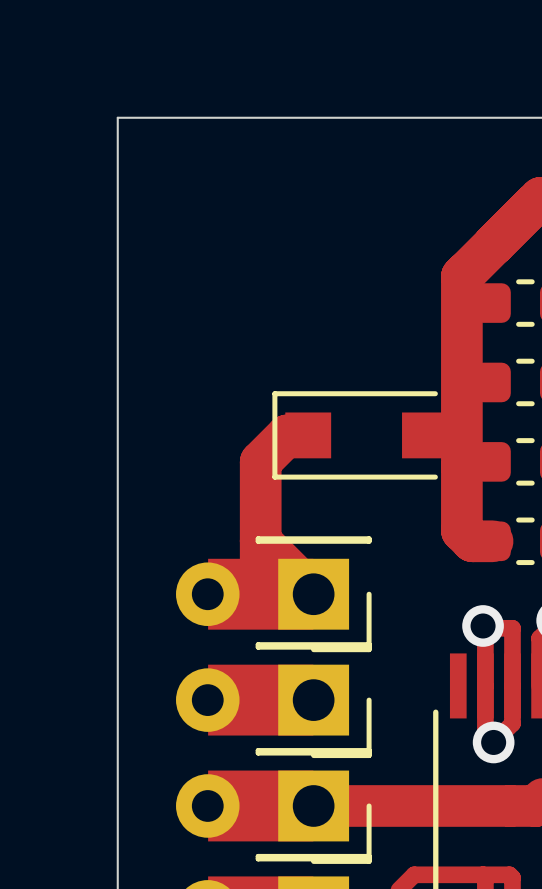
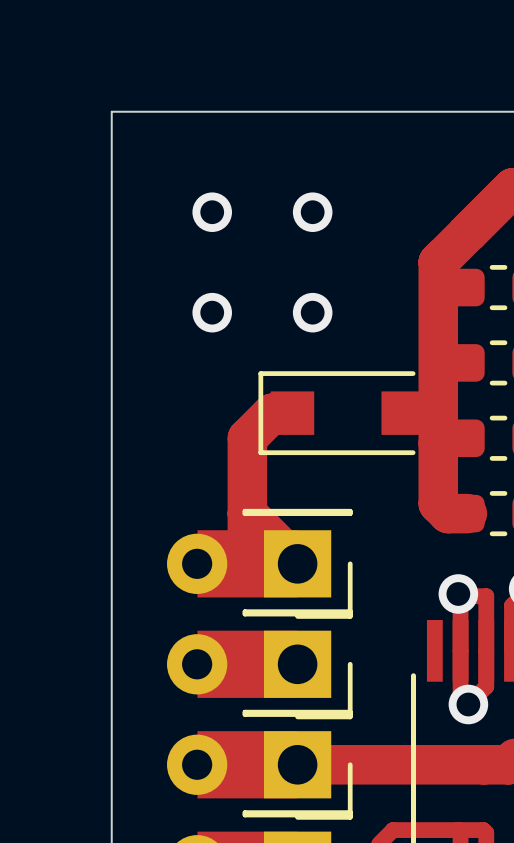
via: none -> (212, 212)
via: none -> (312, 212)
via: none -> (212, 312)
via: none -> (312, 312)

